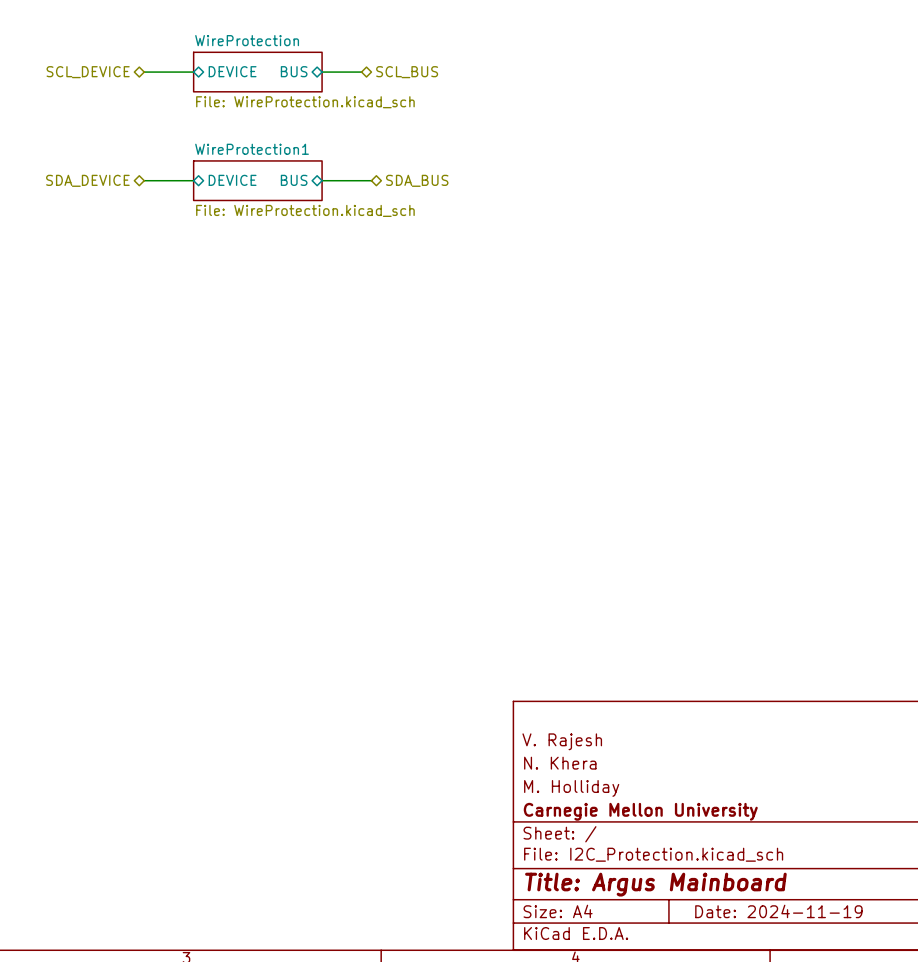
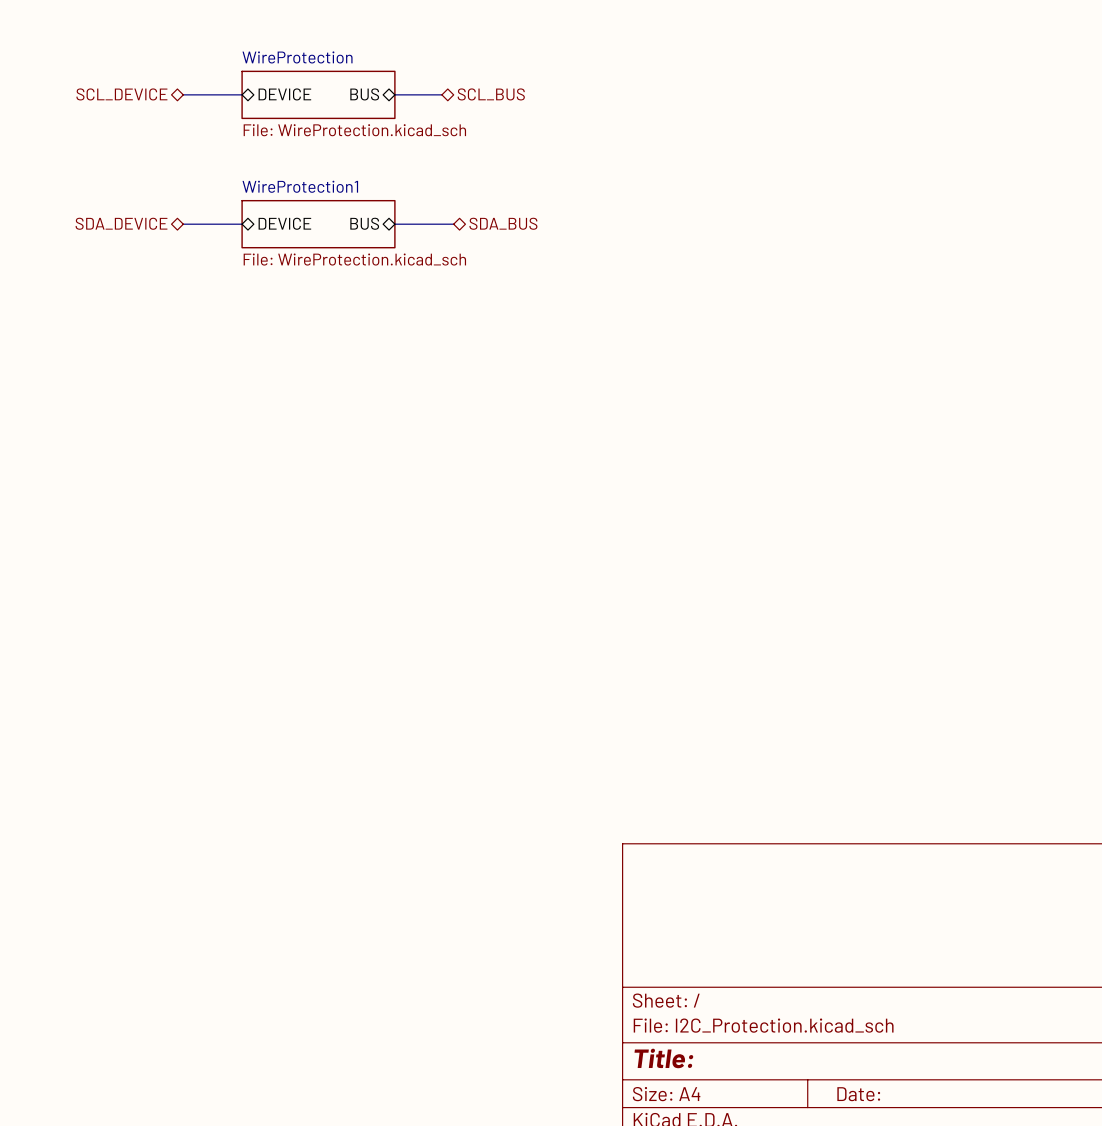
title block: V. Rajesh (562, 741) -> none
title block: N. Khera (560, 763) -> none
title block: M. Holliday (571, 788) -> none
title block: Carnegie Mellon University (640, 811) -> none
title block: Title: Argus Mainboard (655, 884) -> Title: (663, 1058)
title block: Date: 2024-11-19 (778, 911) -> Date: (858, 1094)

